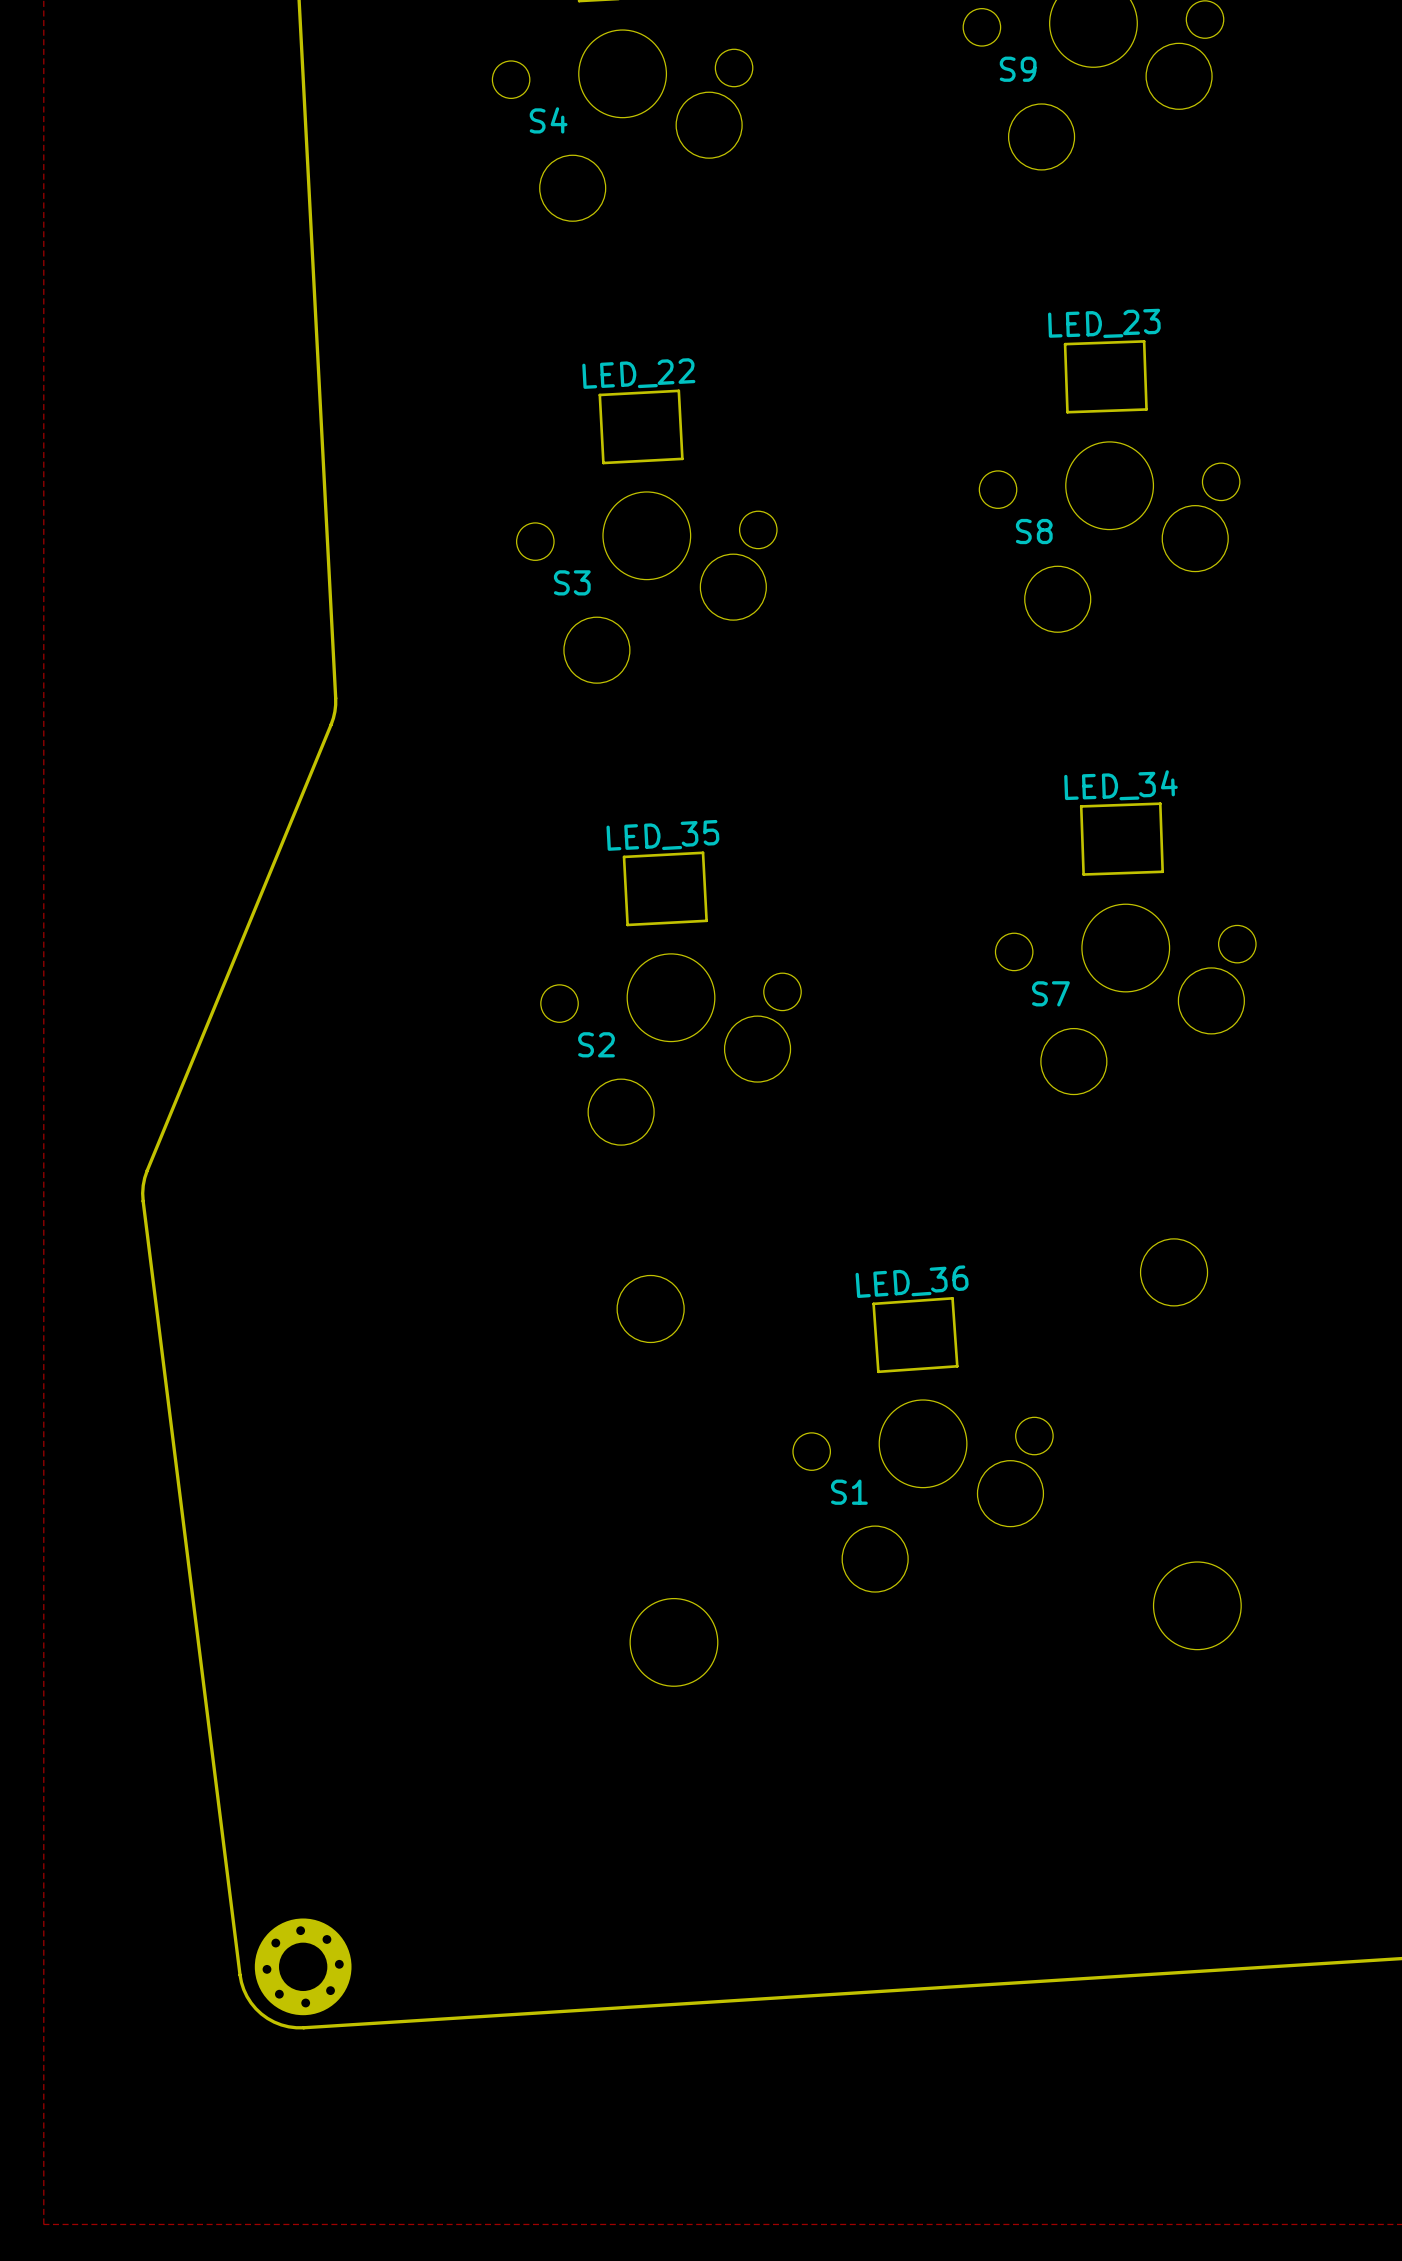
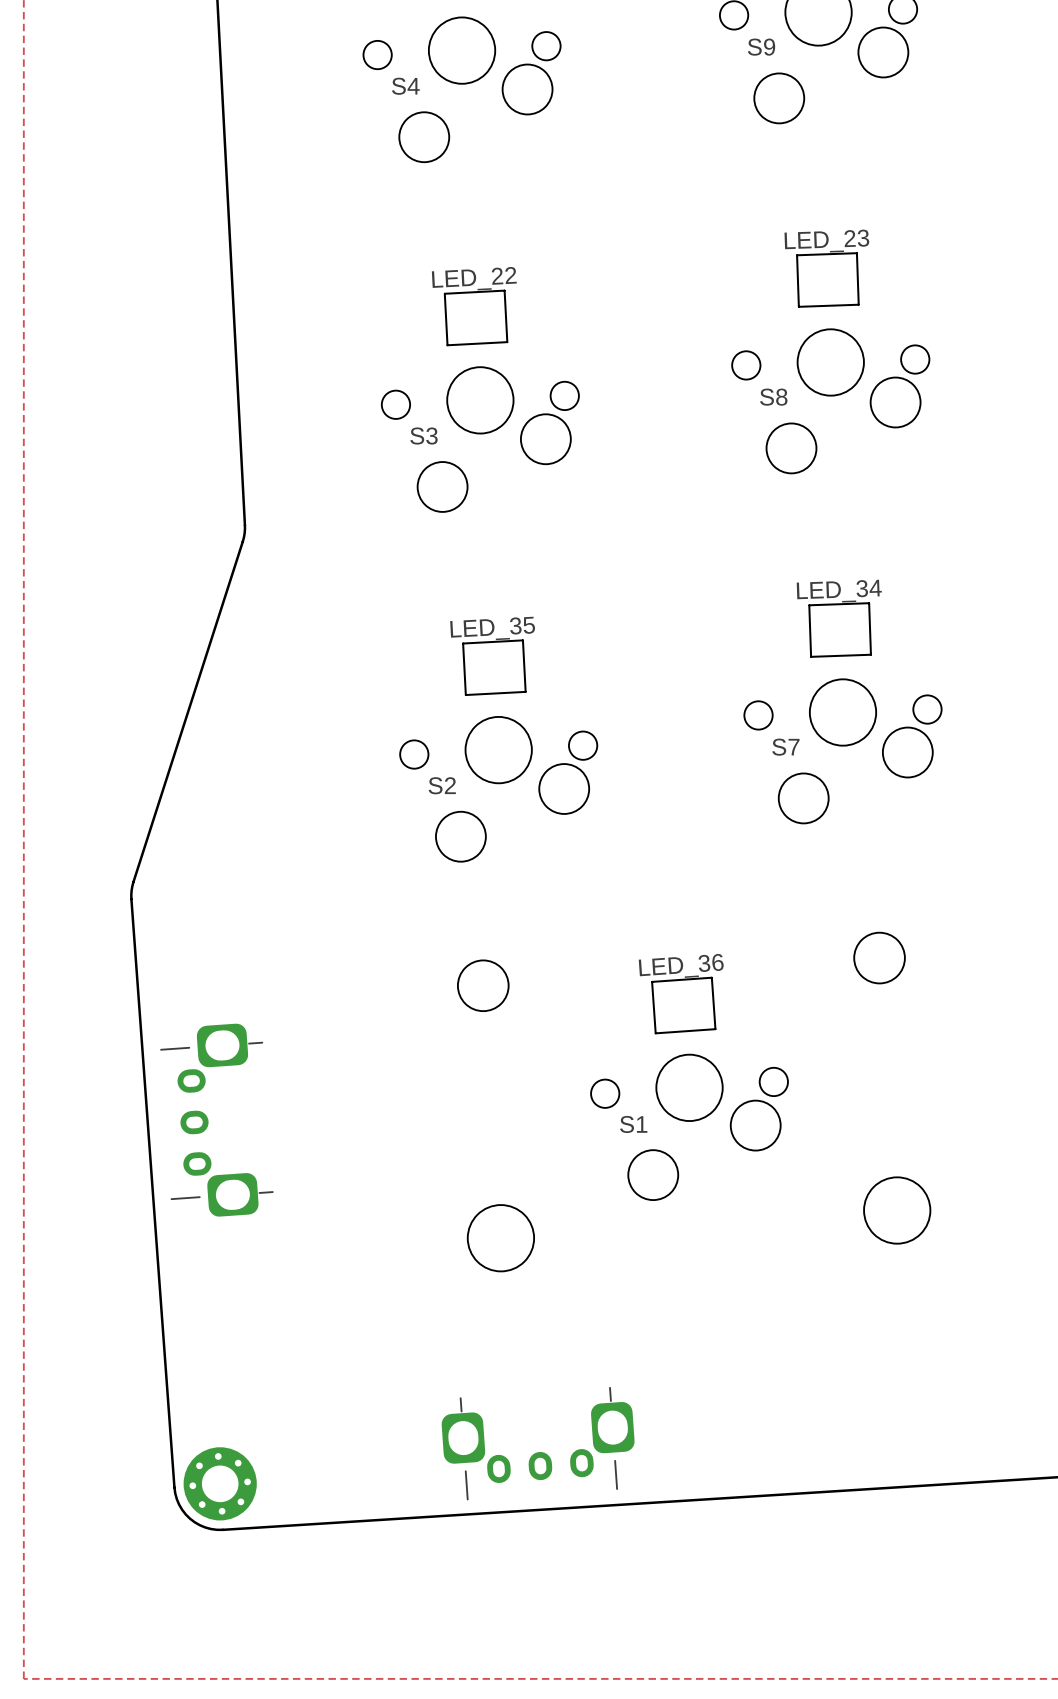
board edge: (335, 698) (331, 724) (147, 1170) (142, 1193) (241, 1982) (251, 2002) (267, 2018) (288, 2026) (306, 2027) -> (244, 523) (242, 541) (133, 881) (131, 894) (175, 1493) (179, 1504) (189, 1518) (205, 1527) (222, 1529)
part: none -> (216, 1120)
part: none -> (538, 1443)

